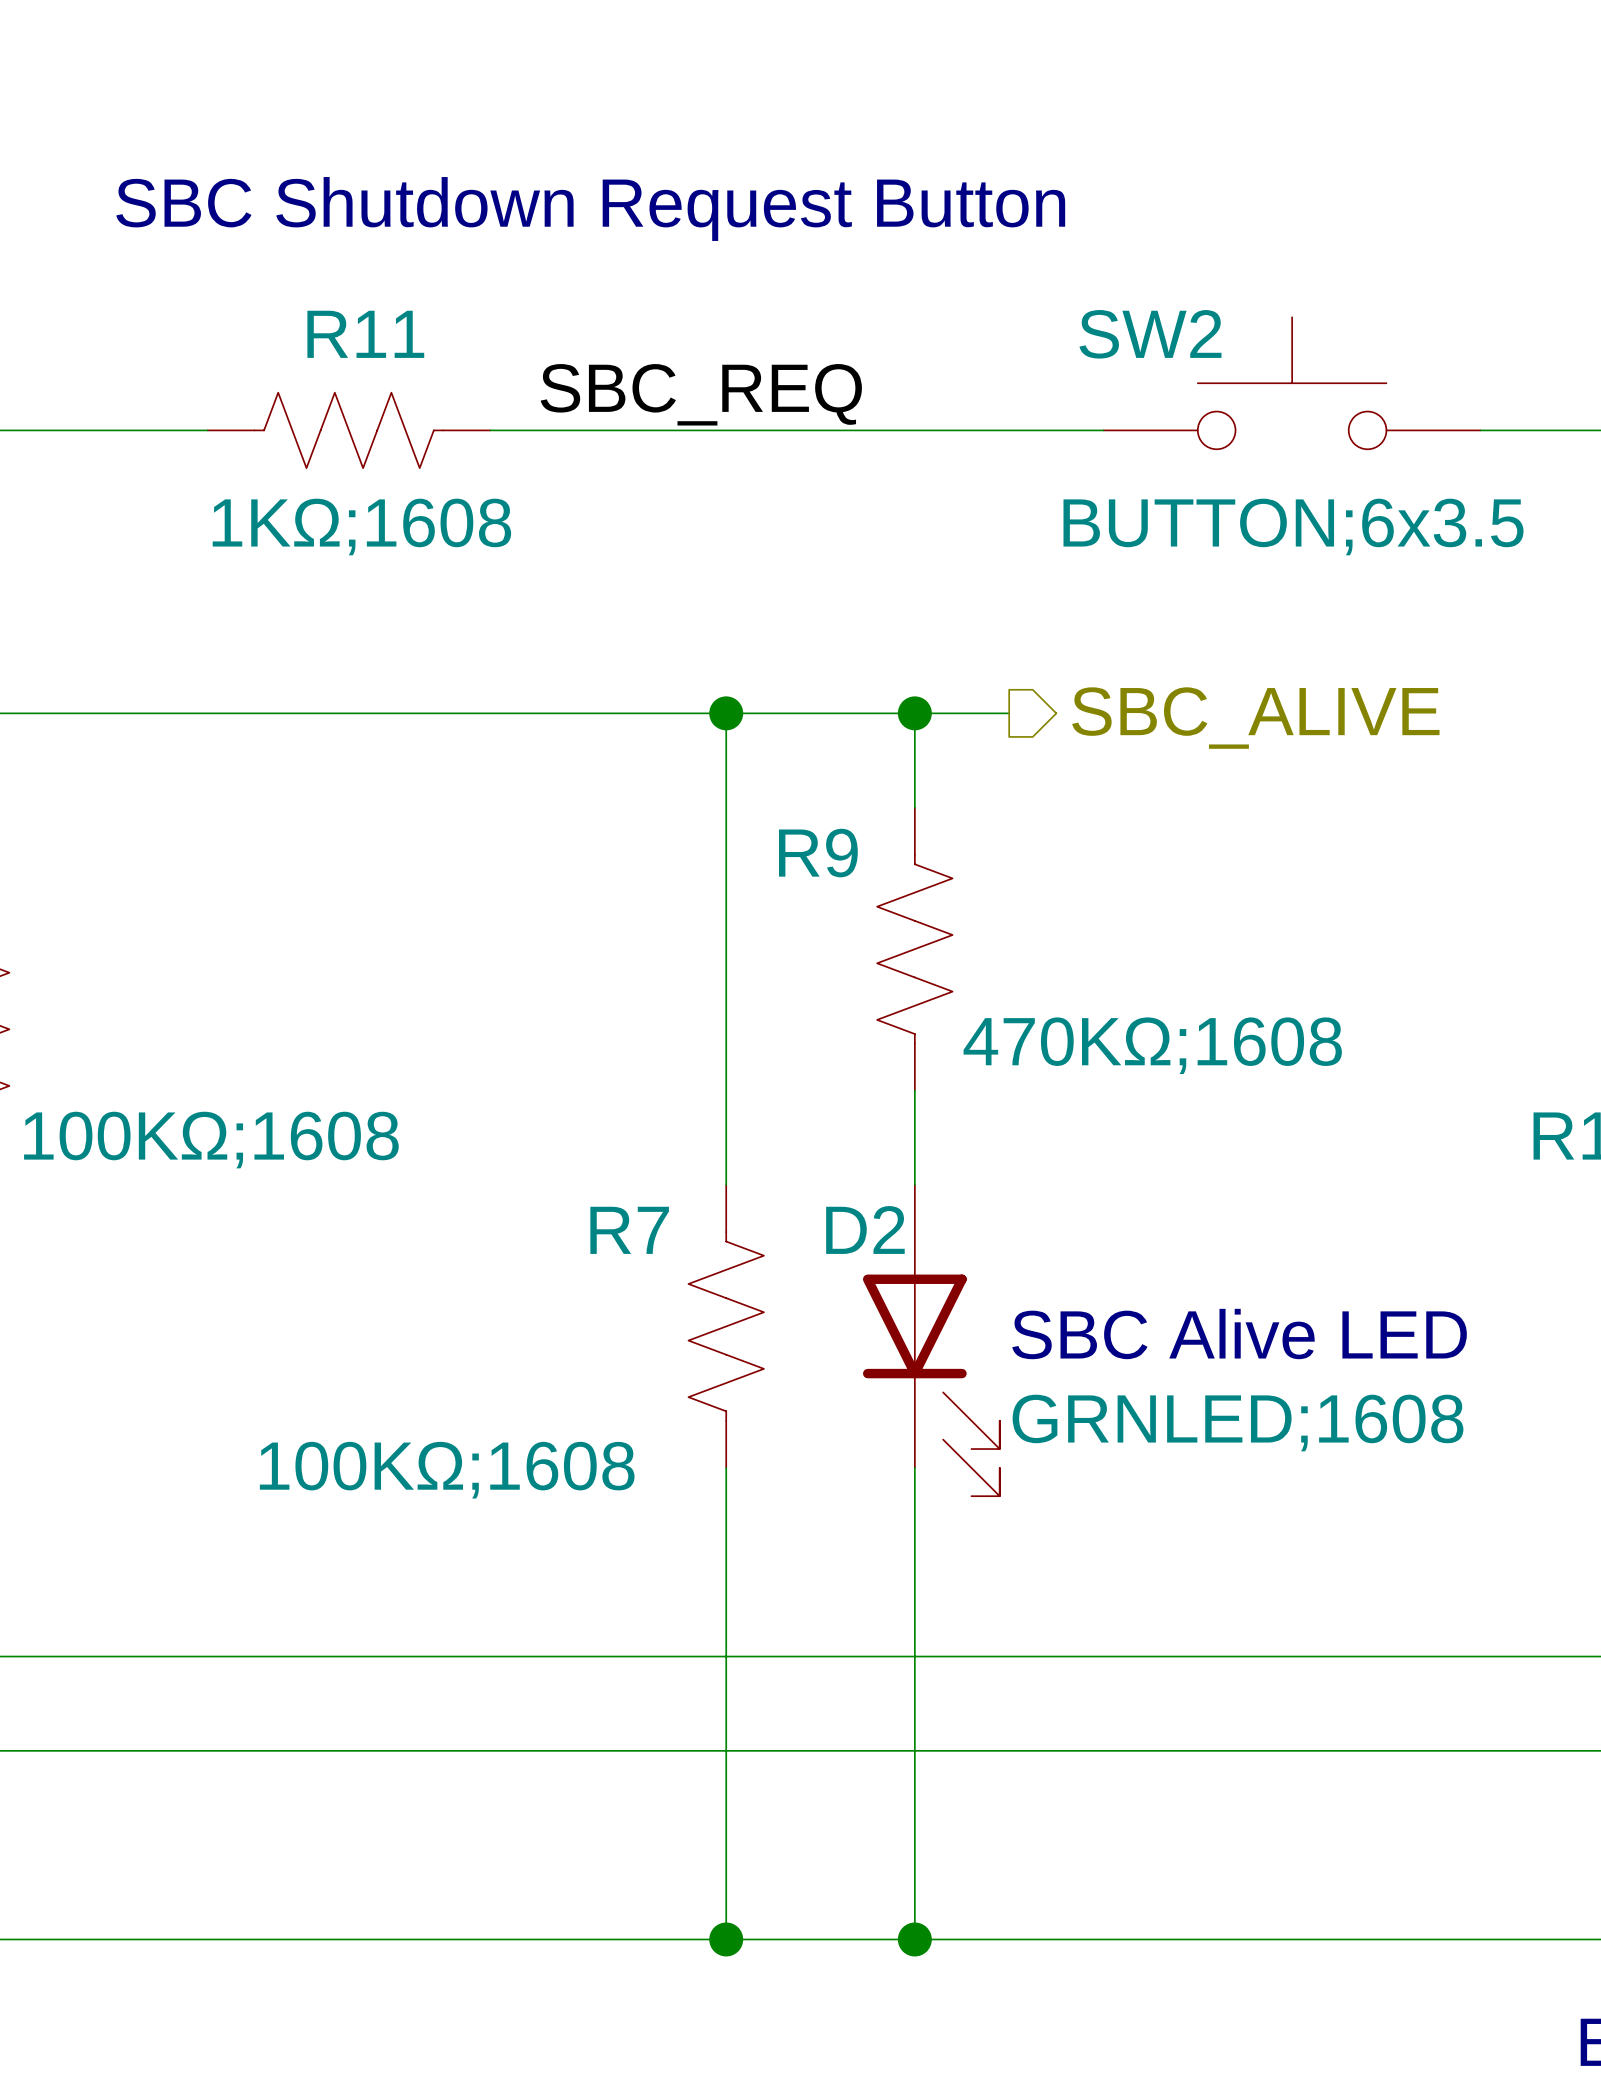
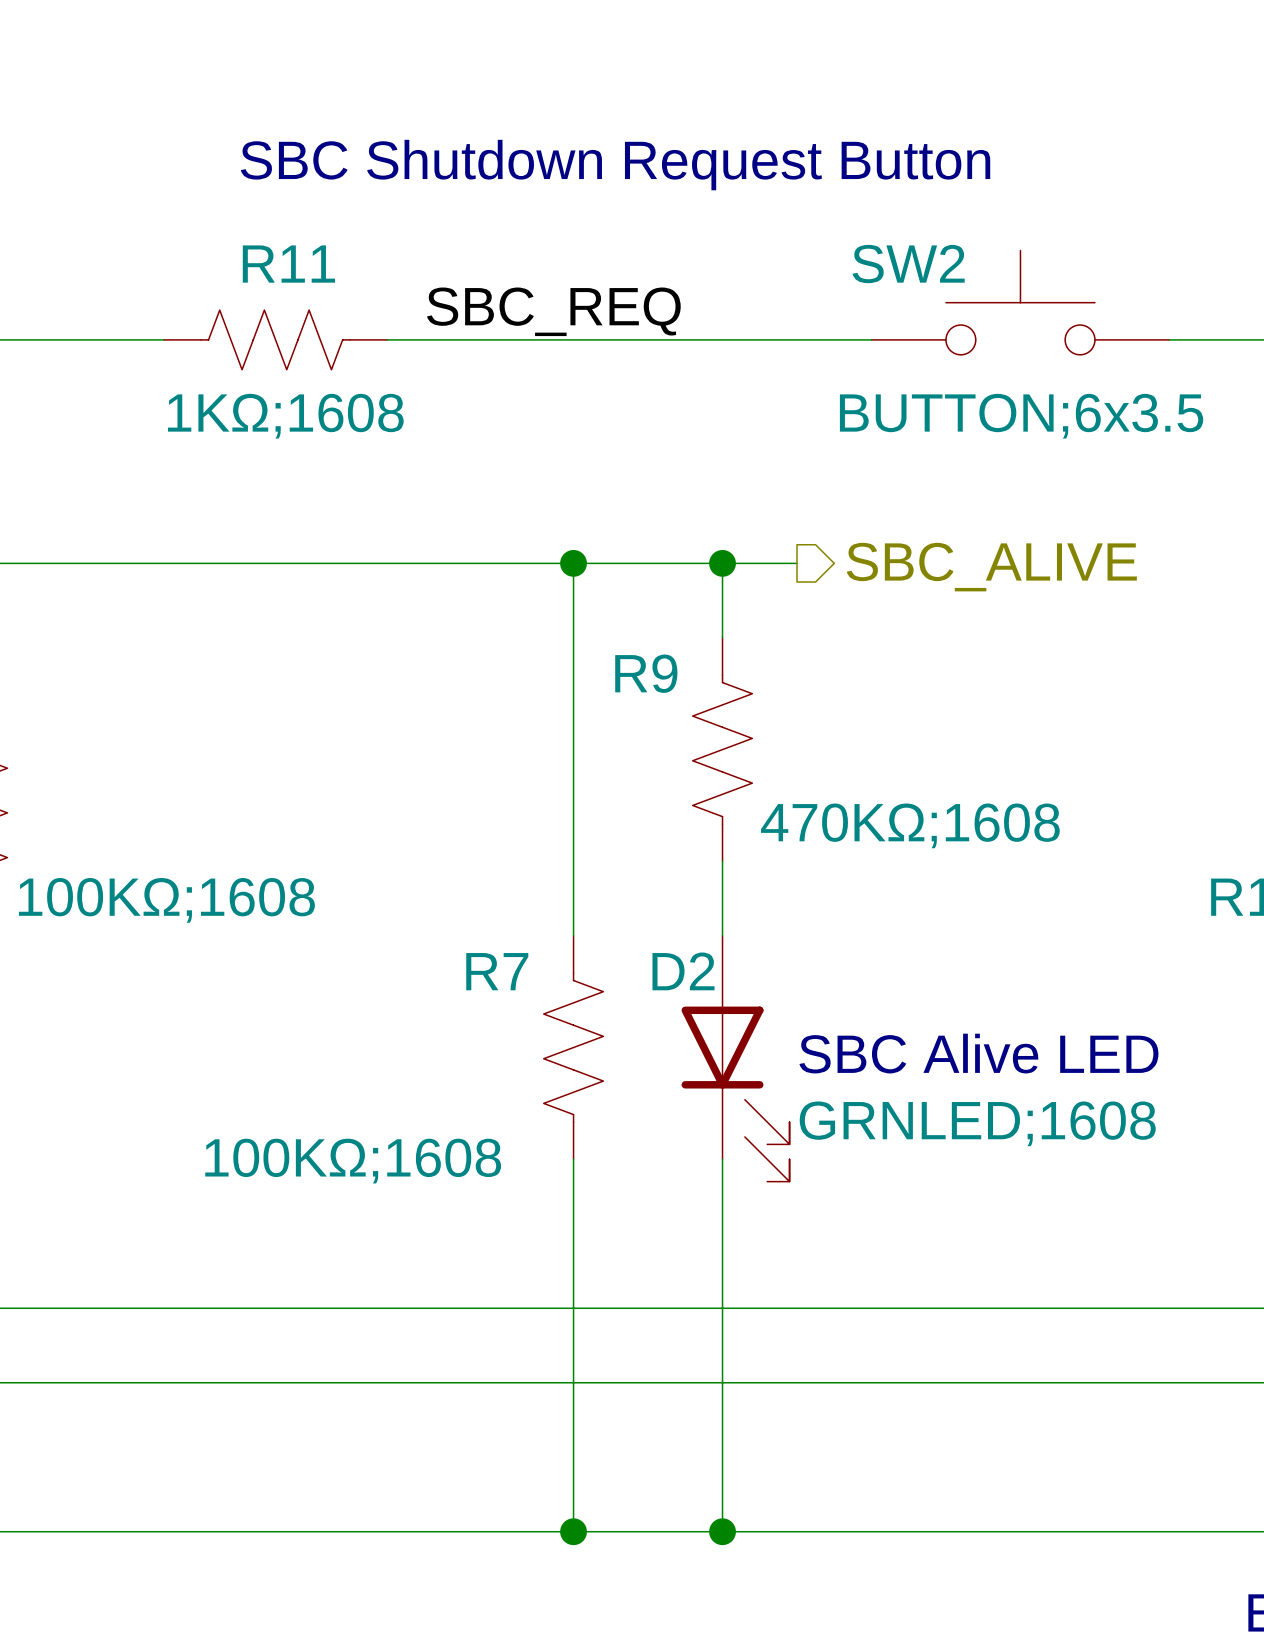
text position: SBC Shutdown Request Button (590, 208) -> SBC Shutdown Request Button (615, 165)

